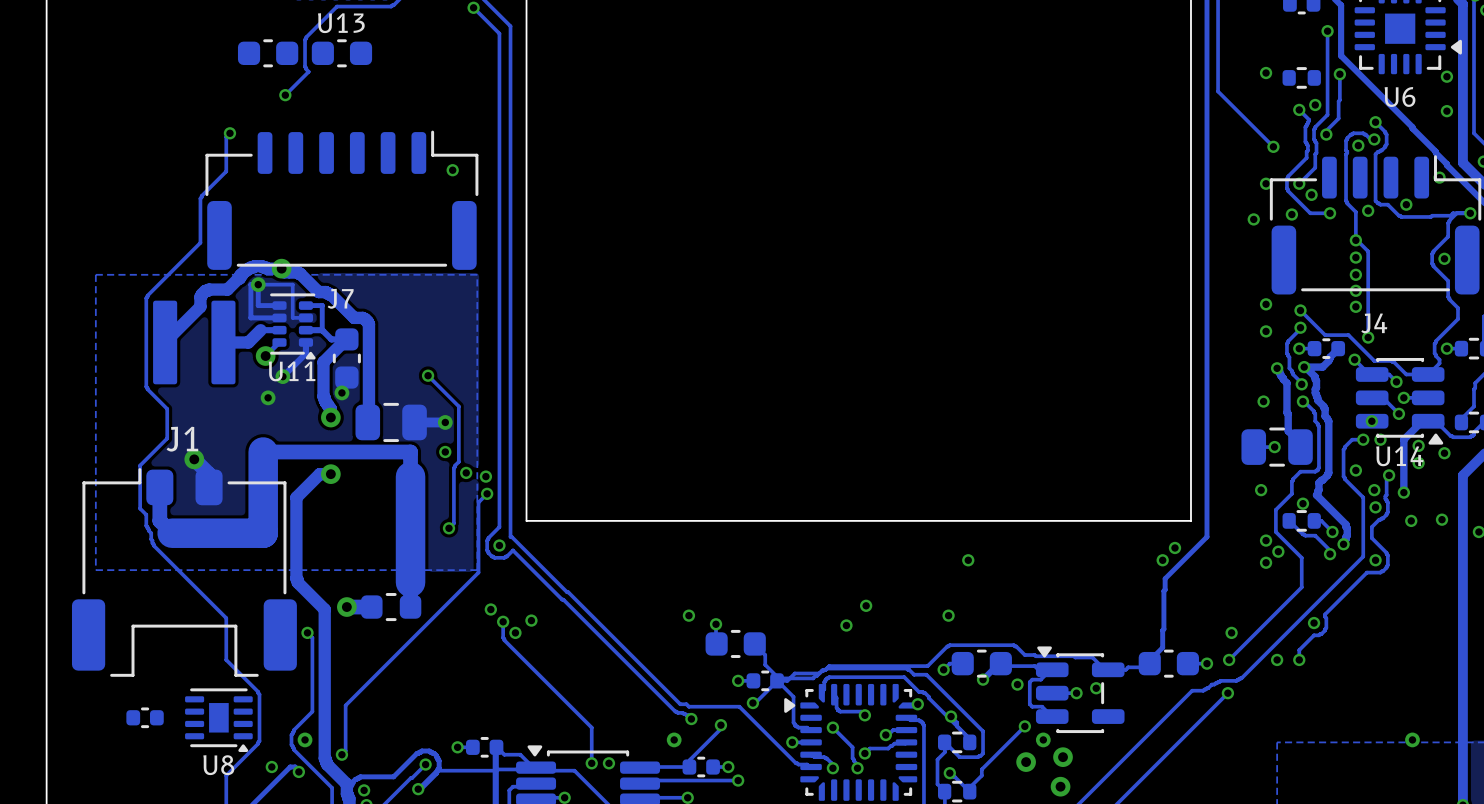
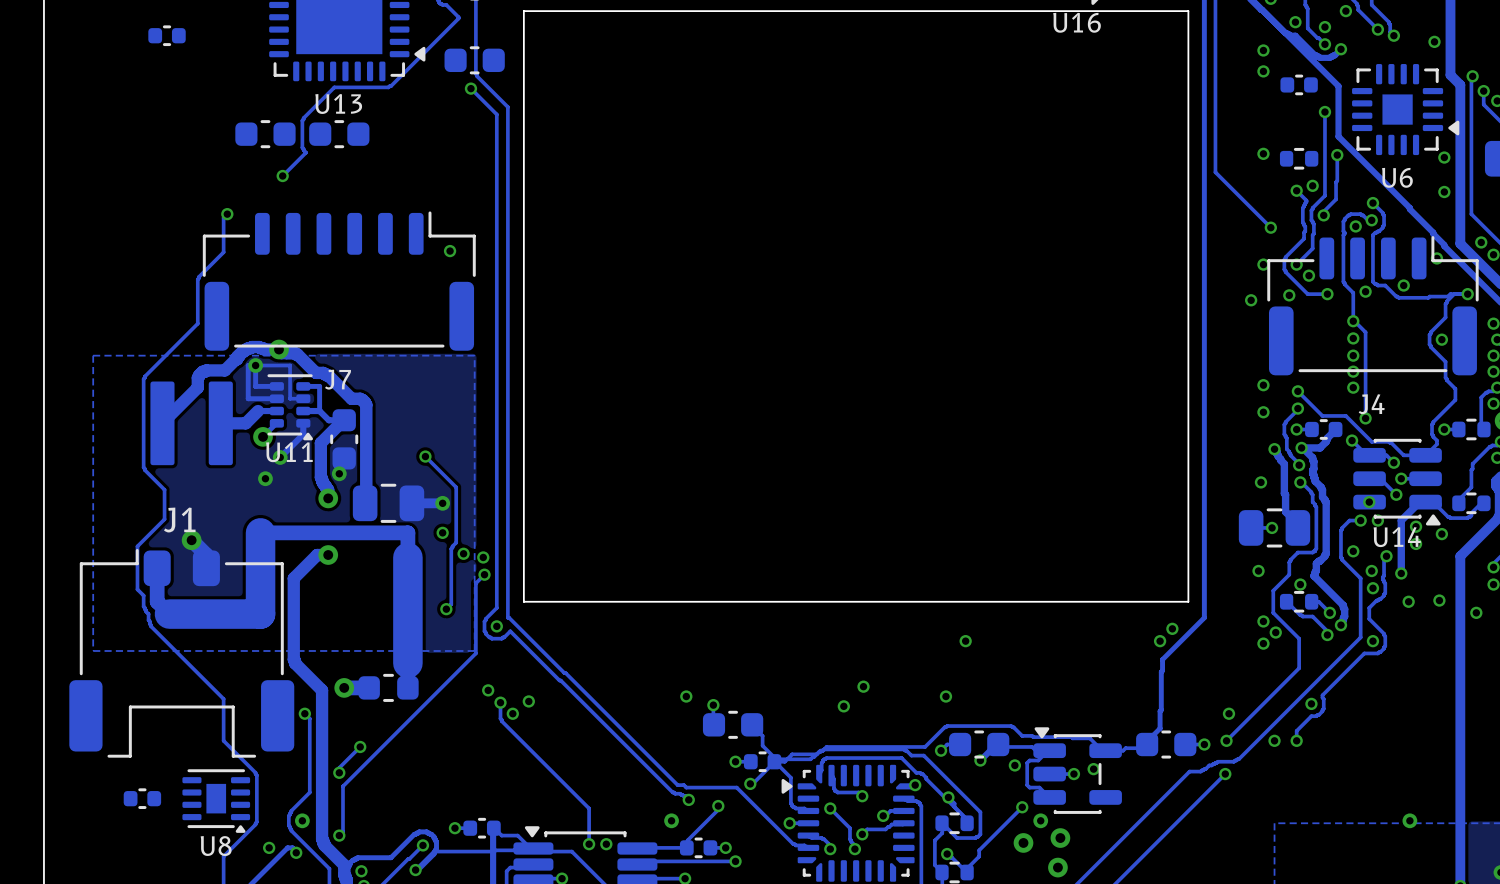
track: none -> (360, 746) (339, 767) (339, 772)
via: none -> (360, 746)
via: none -> (339, 772)

